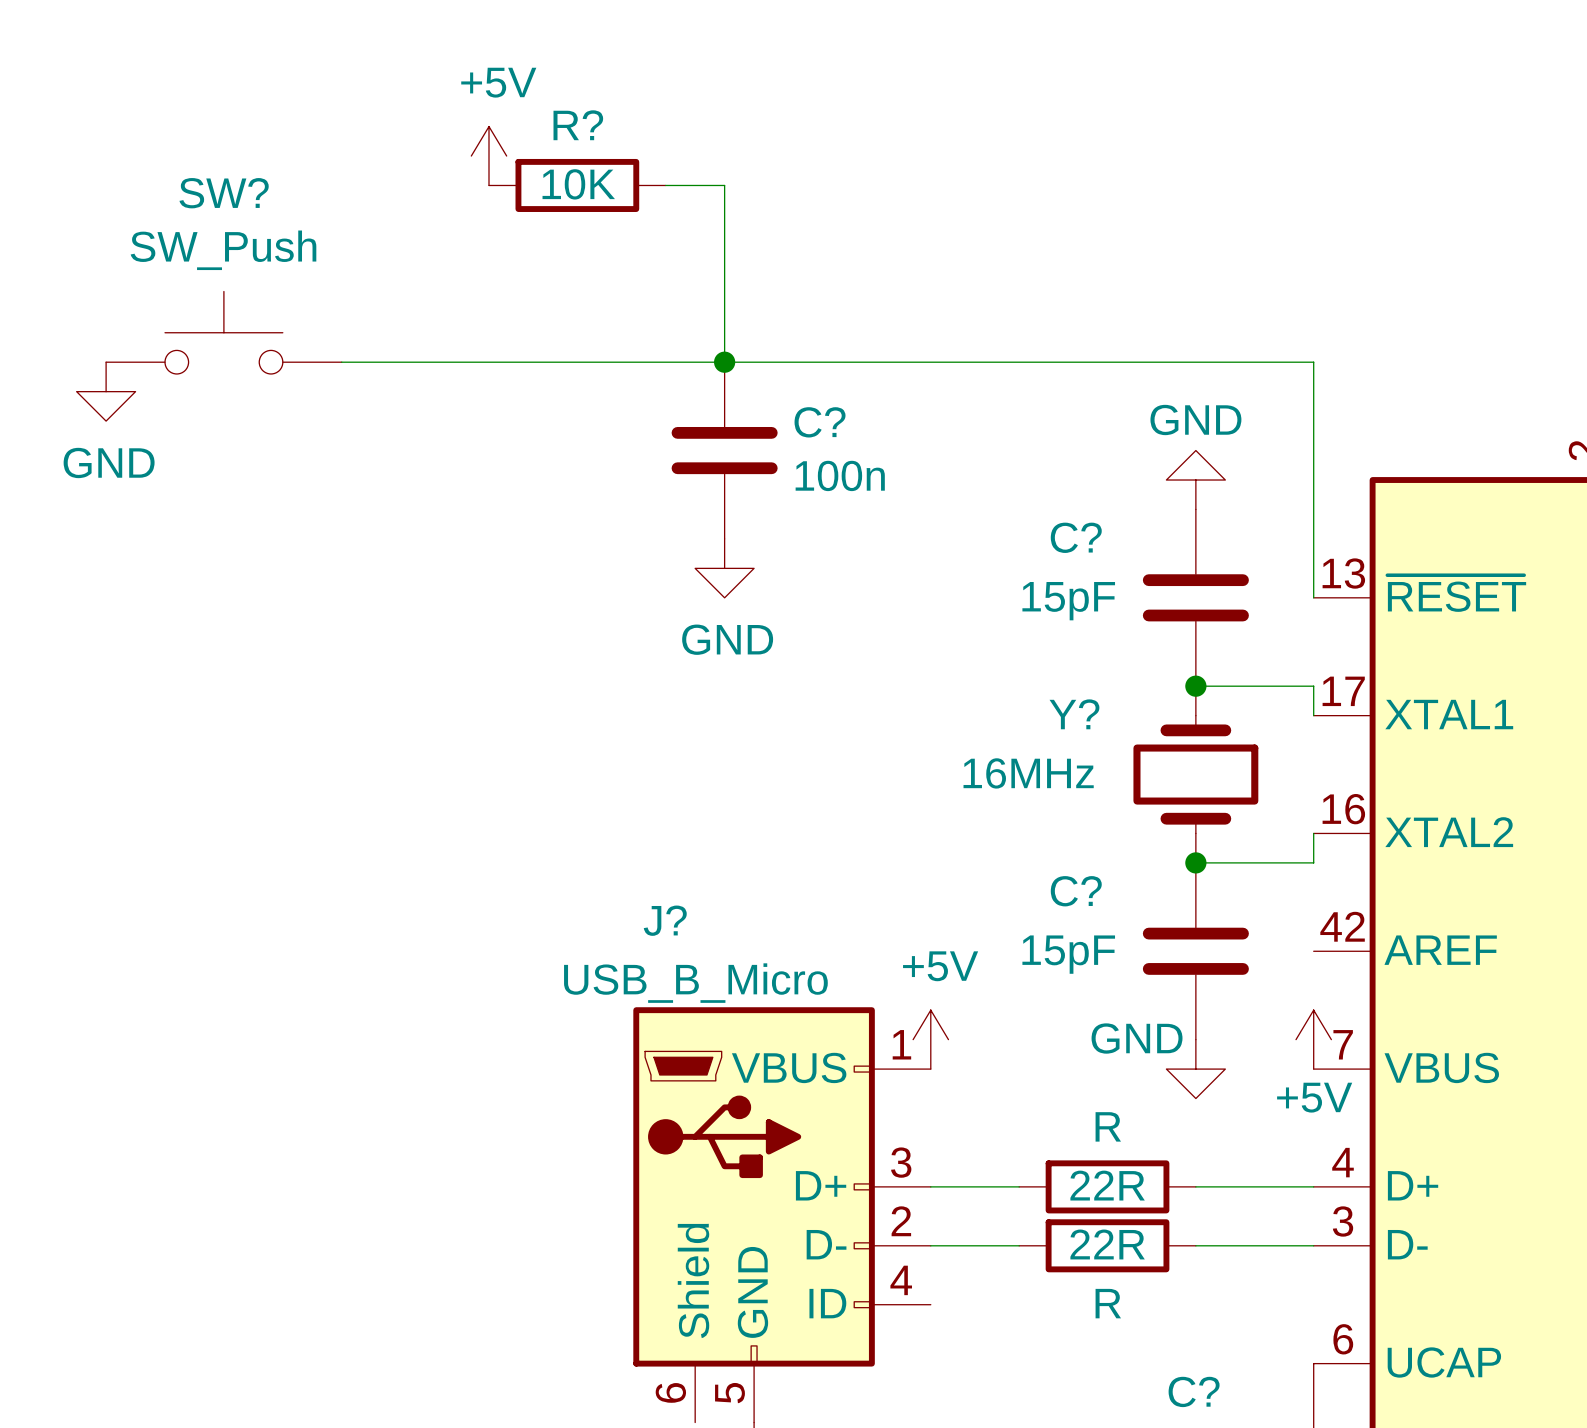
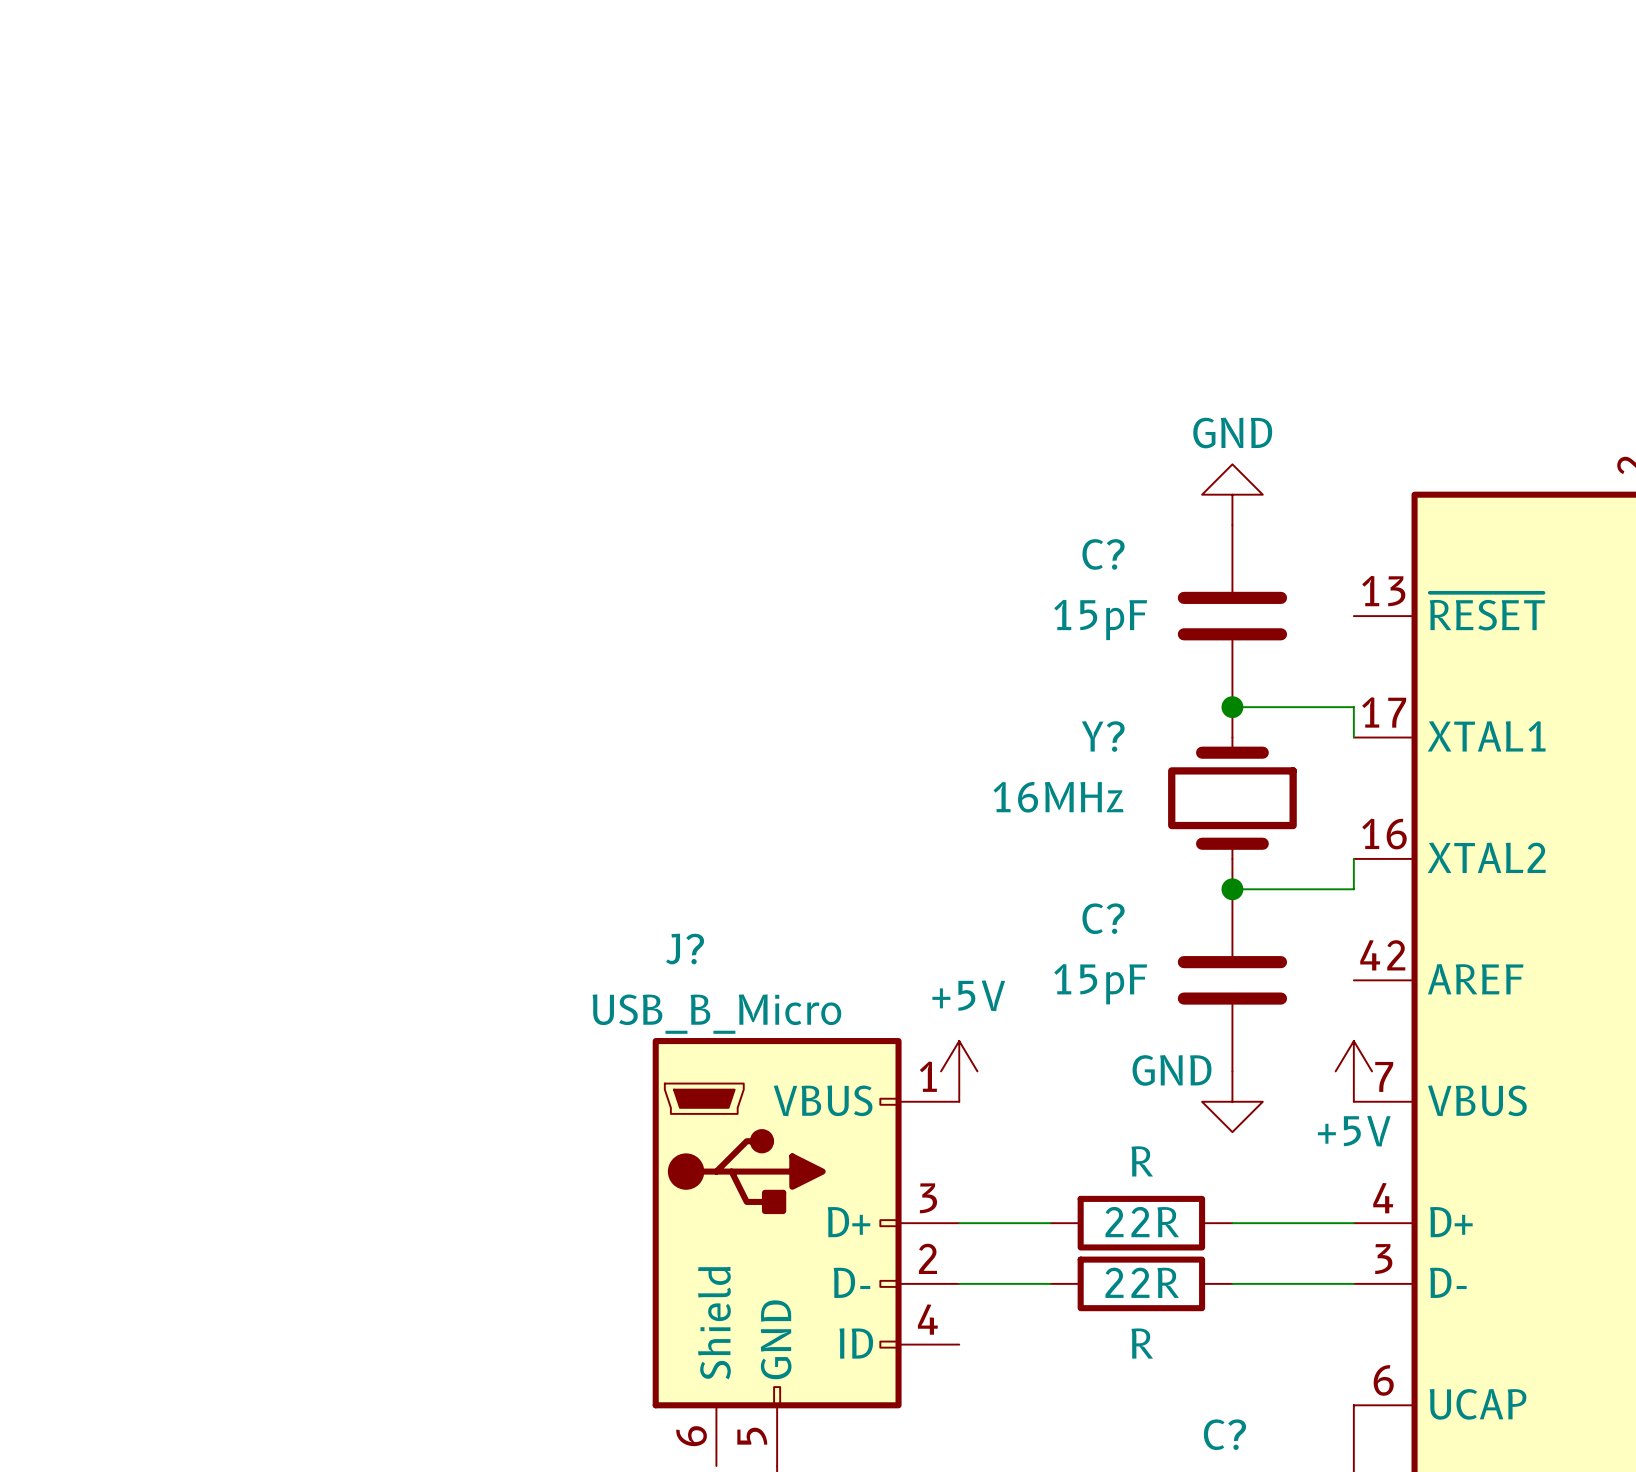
power symbol: +5V (488, 156) -> none
R?: 10K (577, 185) -> none
wire: (665, 185) (724, 185) (724, 362) -> none
SW?: SW_Push (223, 332) -> none
wire: (341, 362) (1313, 362) (1313, 597) -> none
junction: (724, 362) -> none
power symbol: GND (106, 391) -> none
C?: 100n (724, 450) -> none
power symbol: GND (724, 568) -> none

